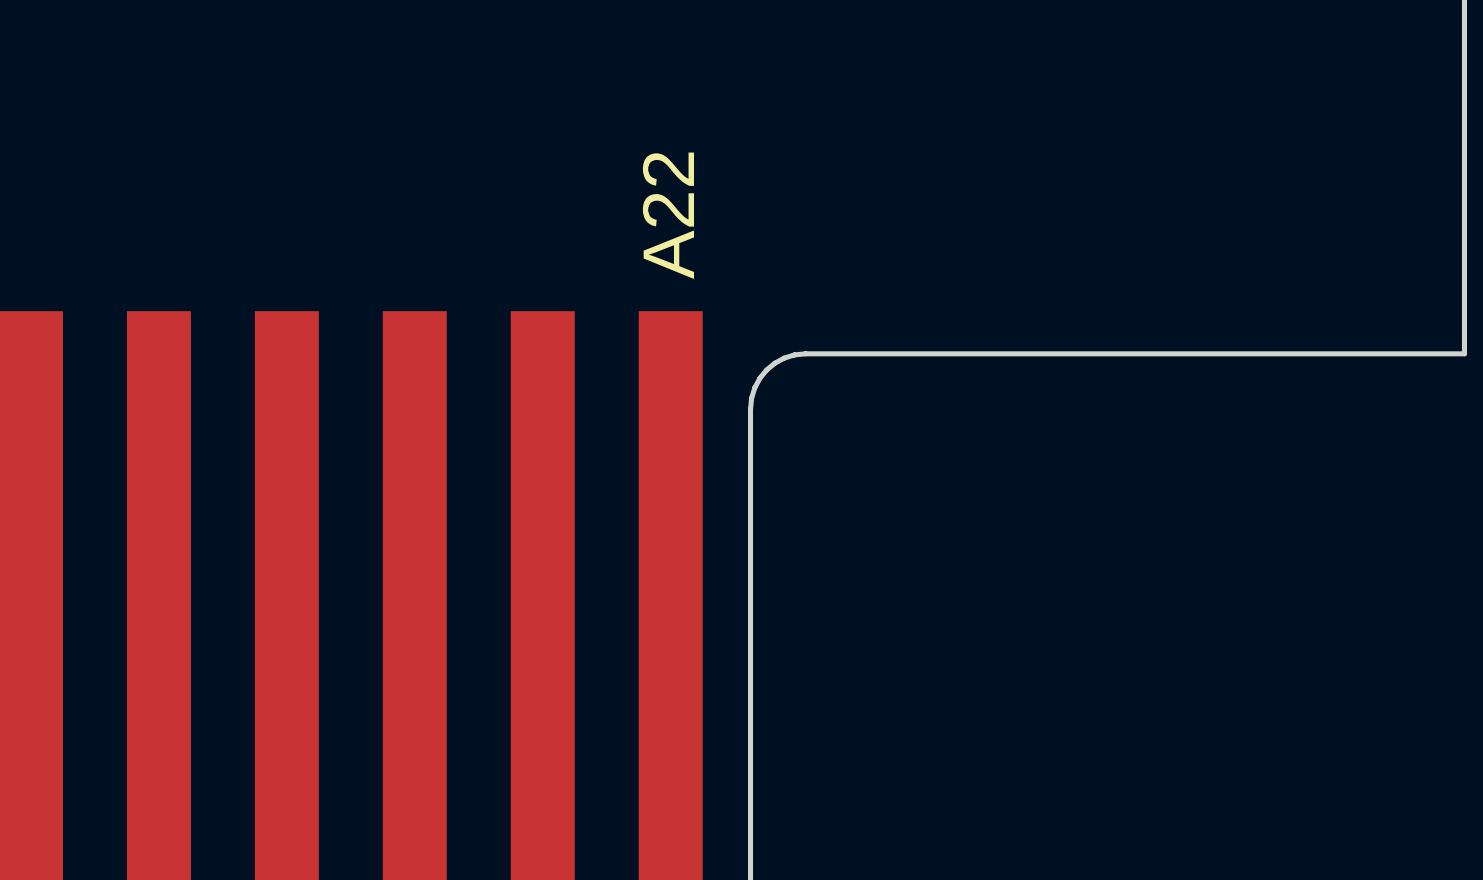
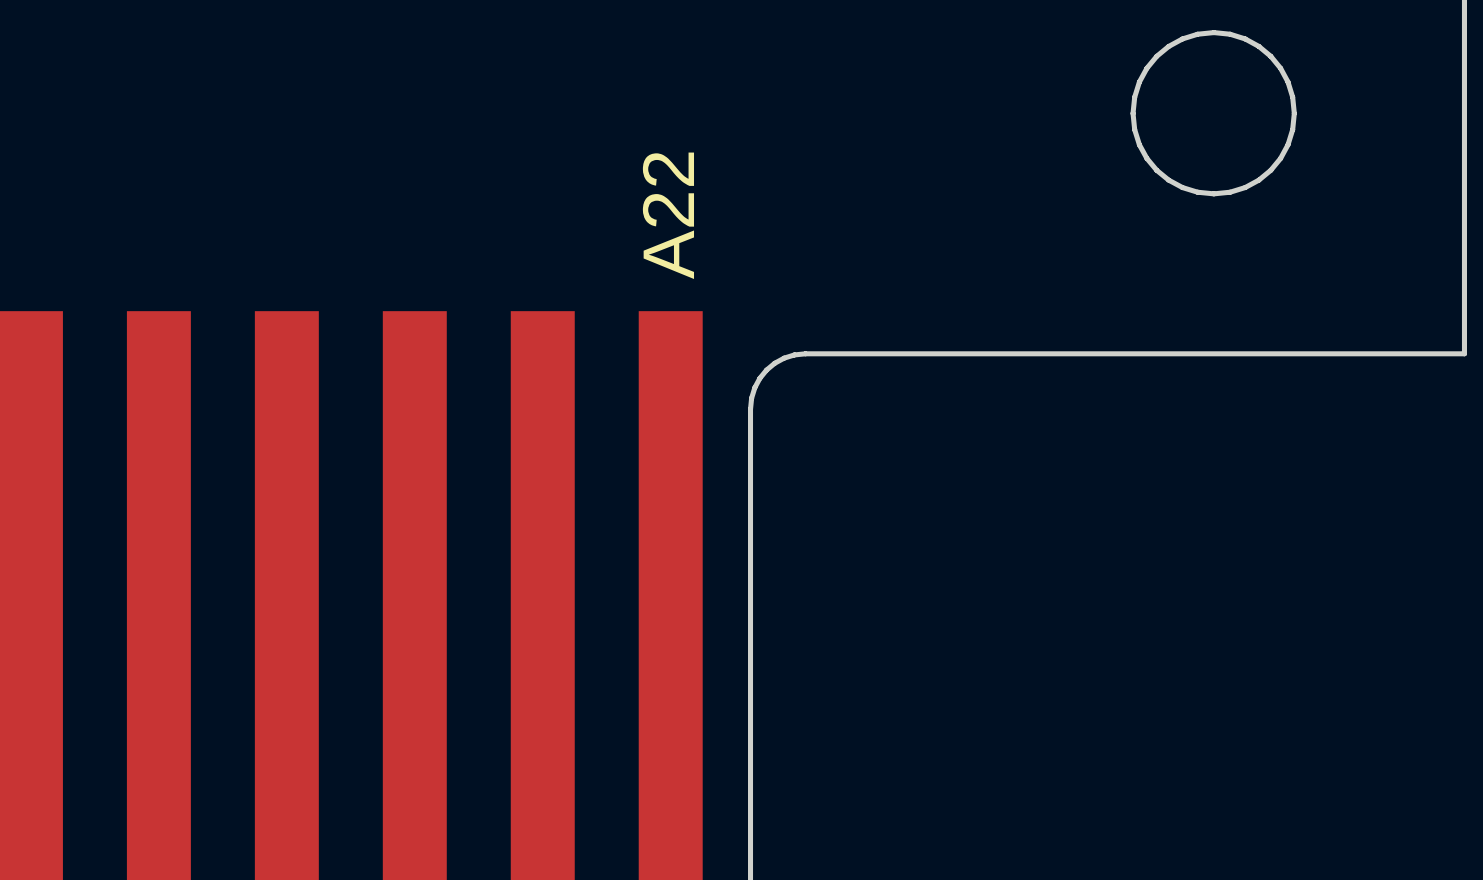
board edge: none -> (1213, 32) (1230, 34) (1245, 38) (1270, 56) (1288, 82) (1292, 97) (1294, 113) (1292, 129) (1288, 144) (1270, 170) (1245, 187) (1230, 192) (1213, 193) (1197, 192) (1182, 187) (1156, 170) (1139, 144) (1134, 129) (1133, 113) (1134, 97) (1139, 82) (1156, 56) (1182, 38) (1197, 34) (1213, 32)

